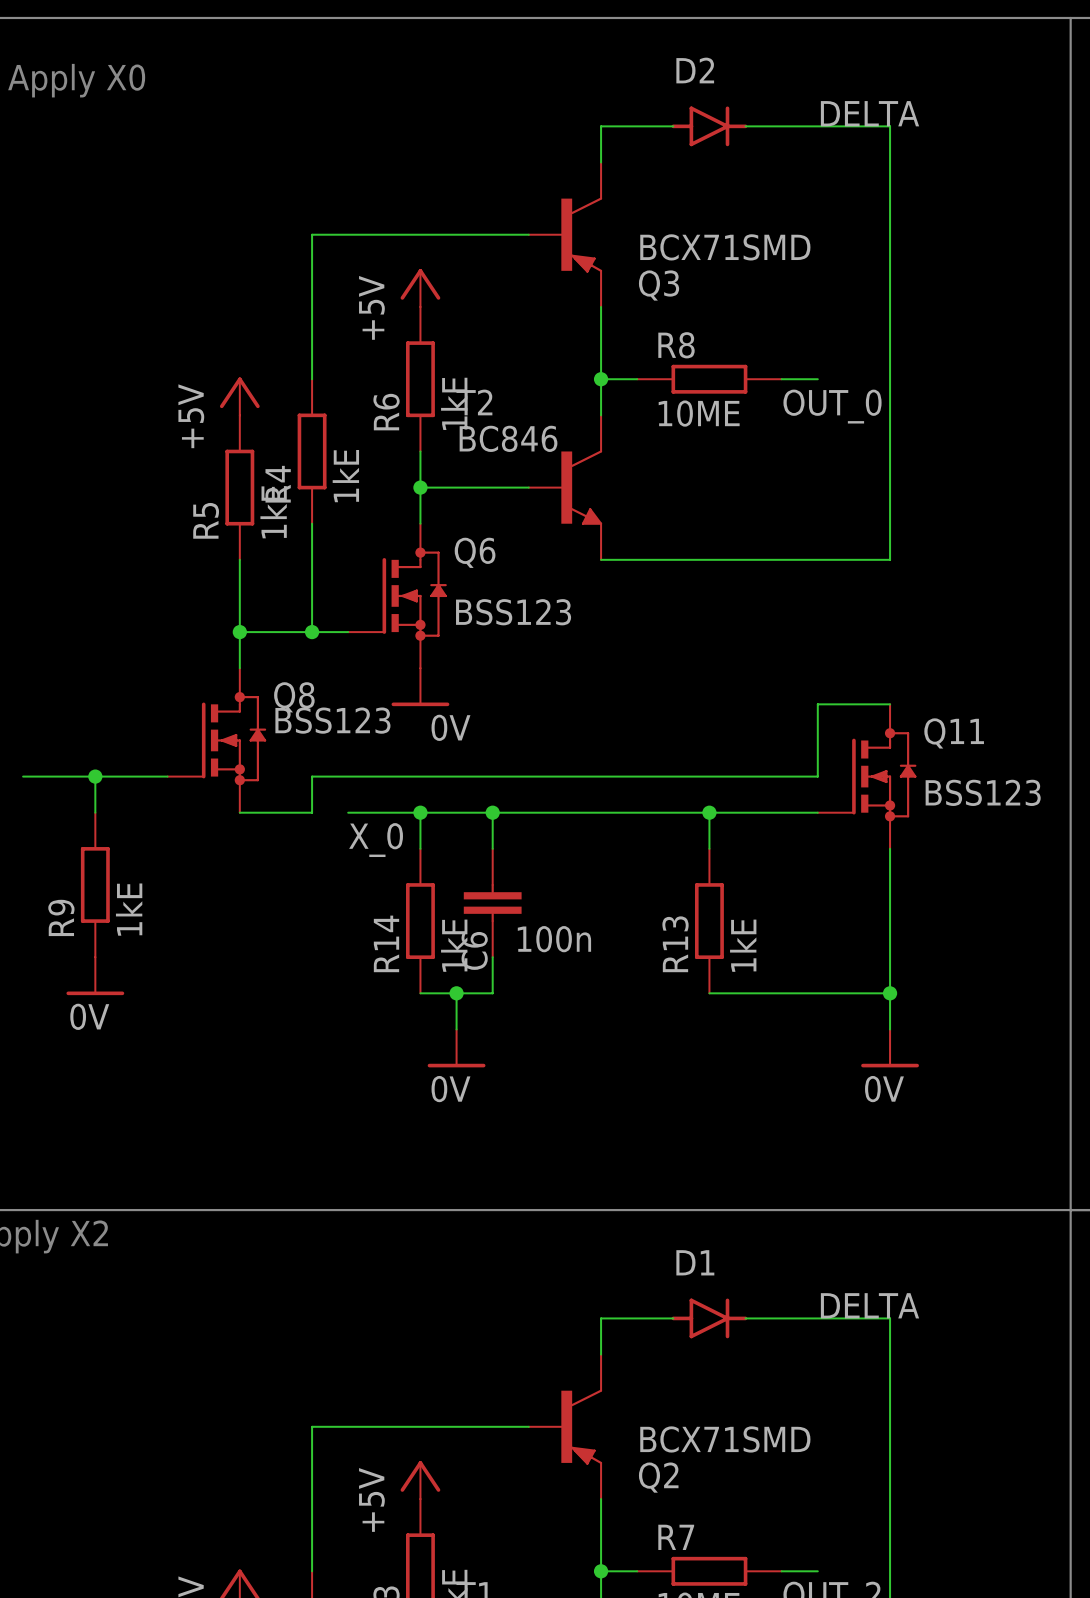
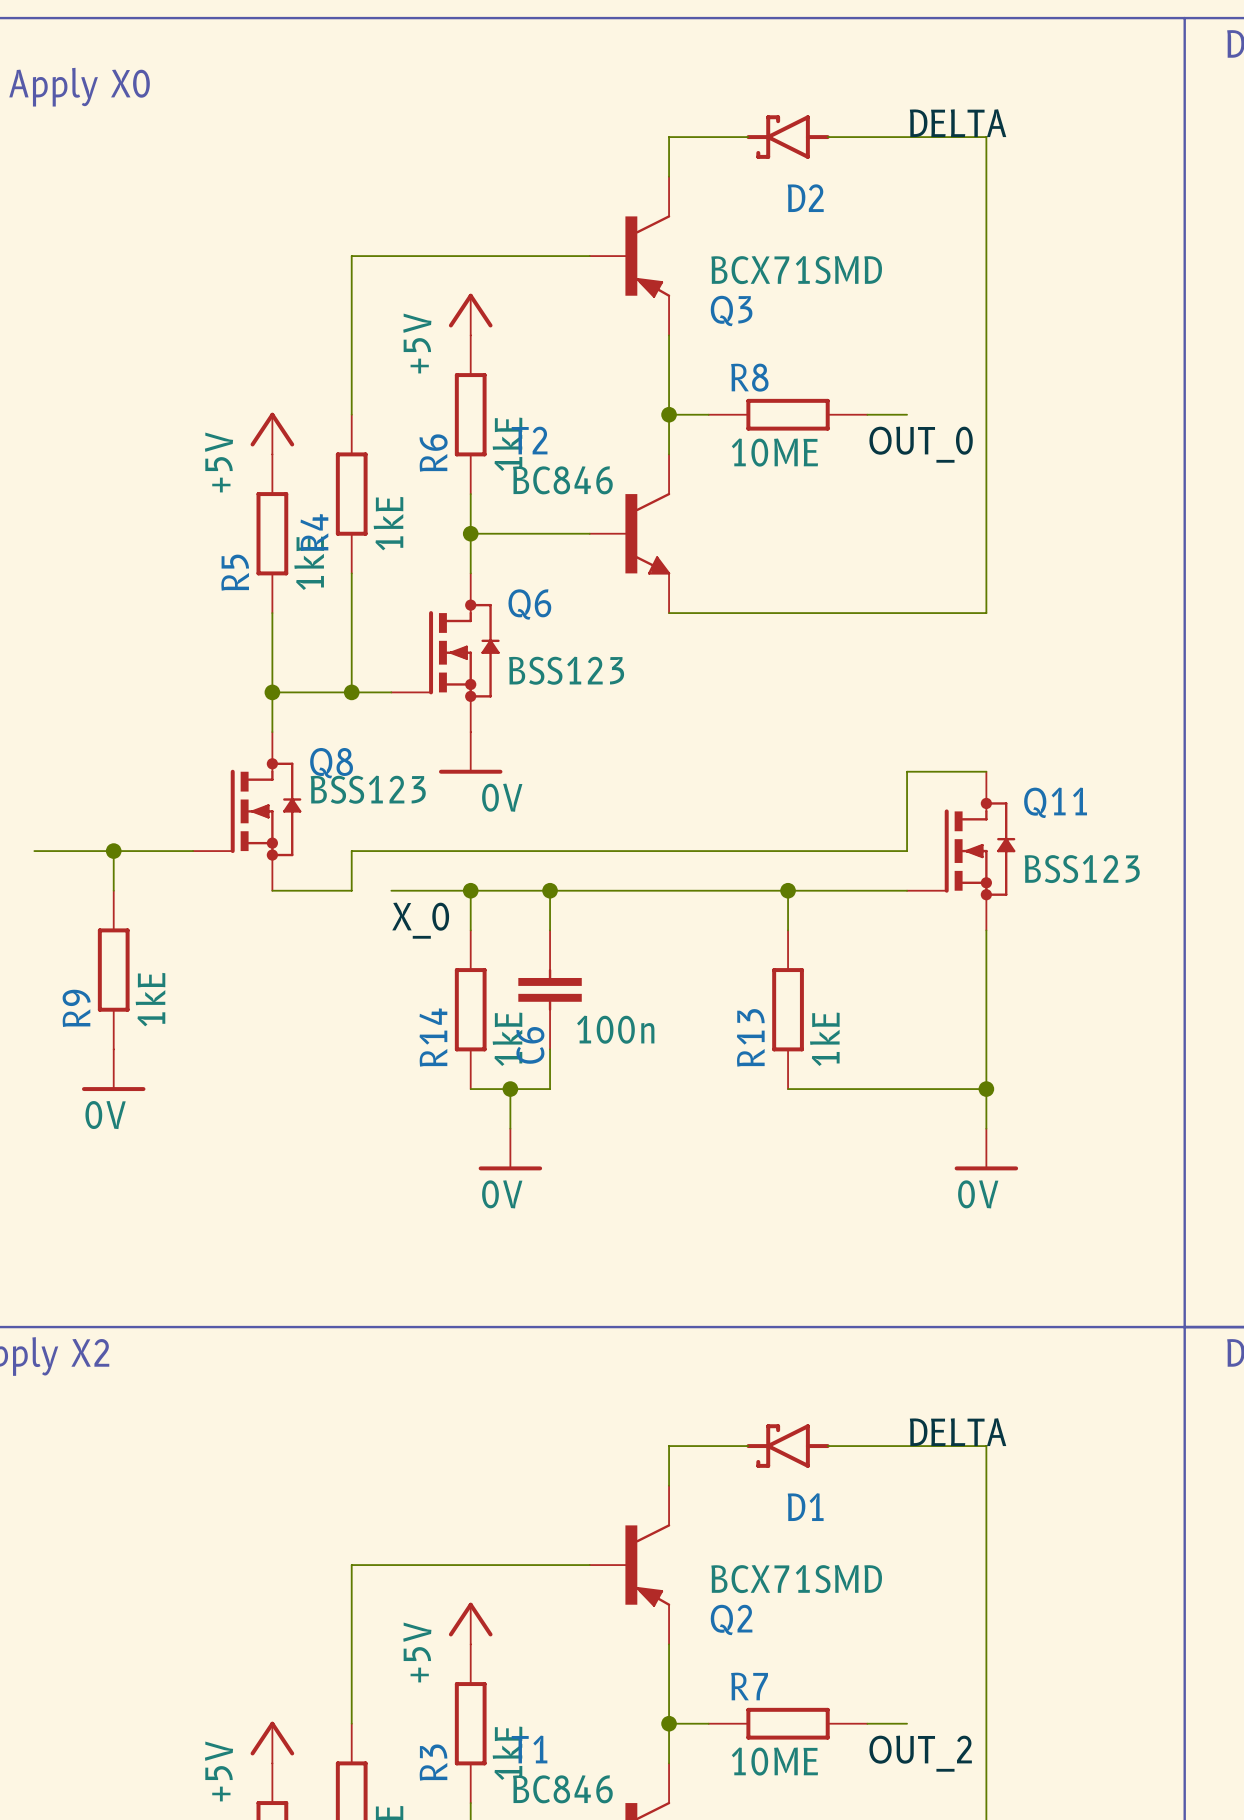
D2 name position: D2 (695, 70) -> D2 (805, 198)
D2 symbol: [671, 106, 748, 147] -> [746, 115, 830, 159]
D1 name position: D1 (695, 1262) -> D1 (805, 1507)
D1 symbol: [671, 1298, 748, 1339] -> [746, 1424, 830, 1468]

